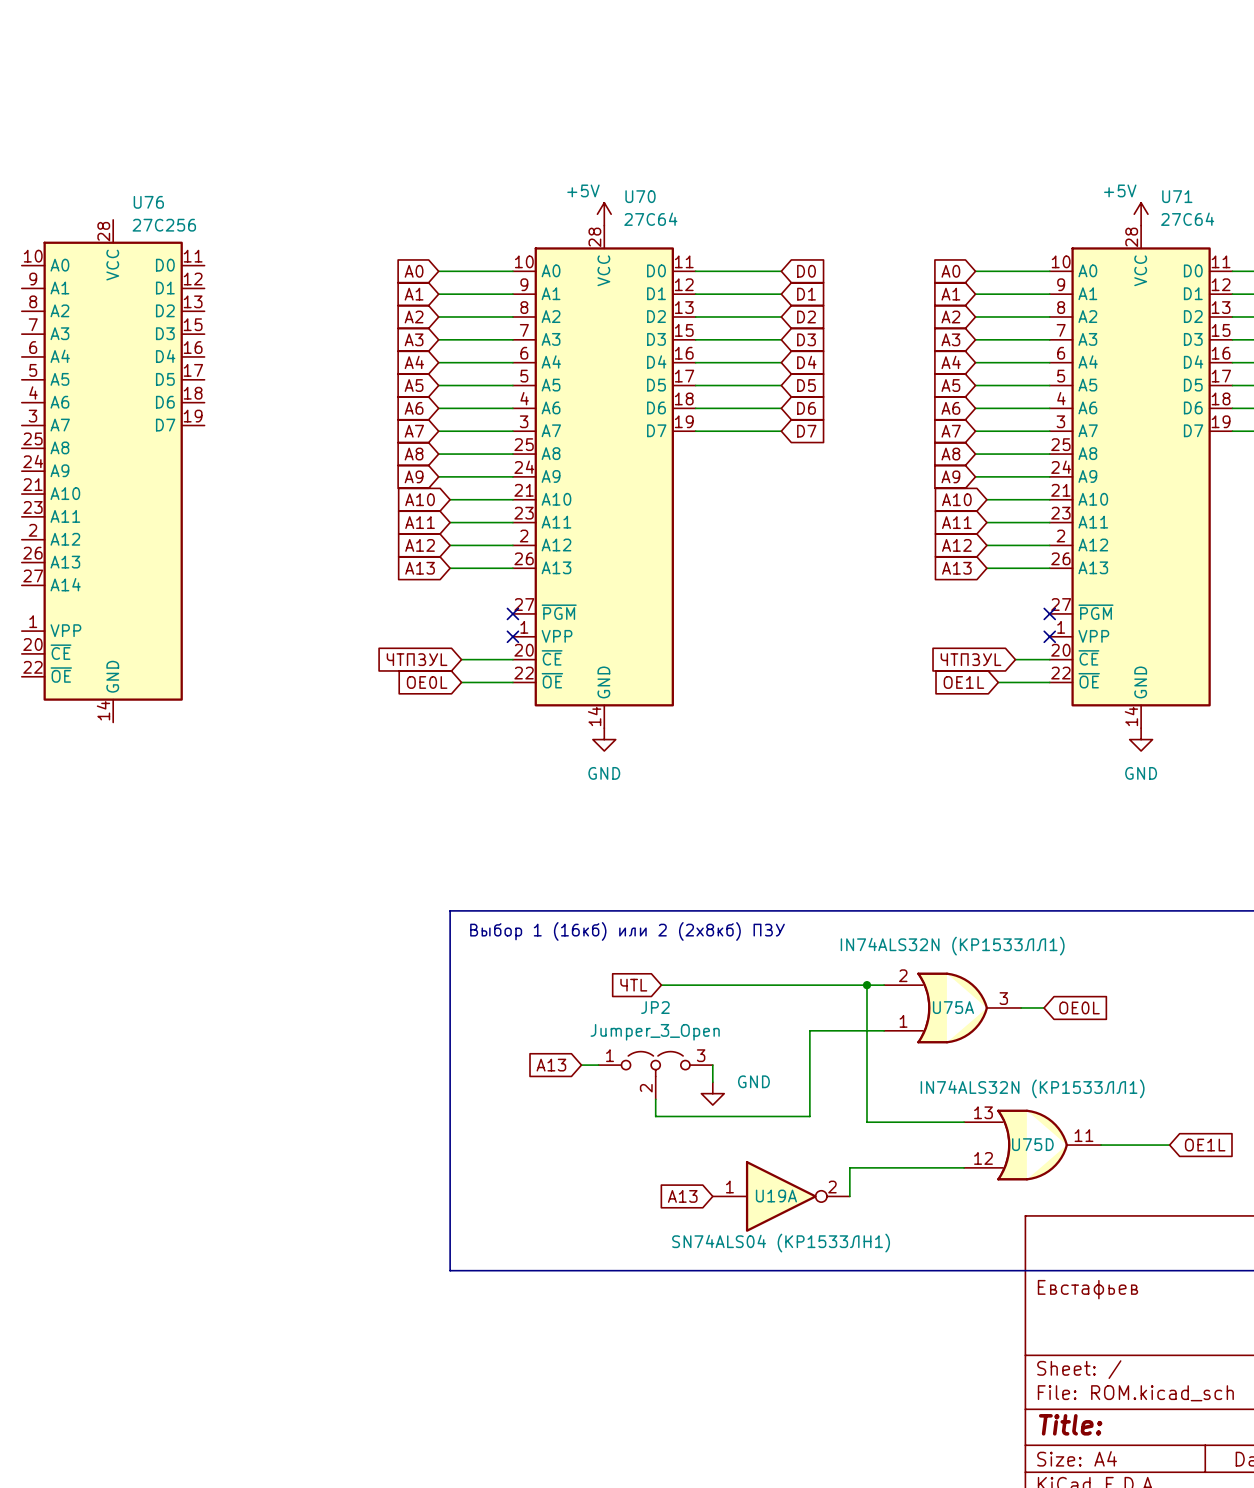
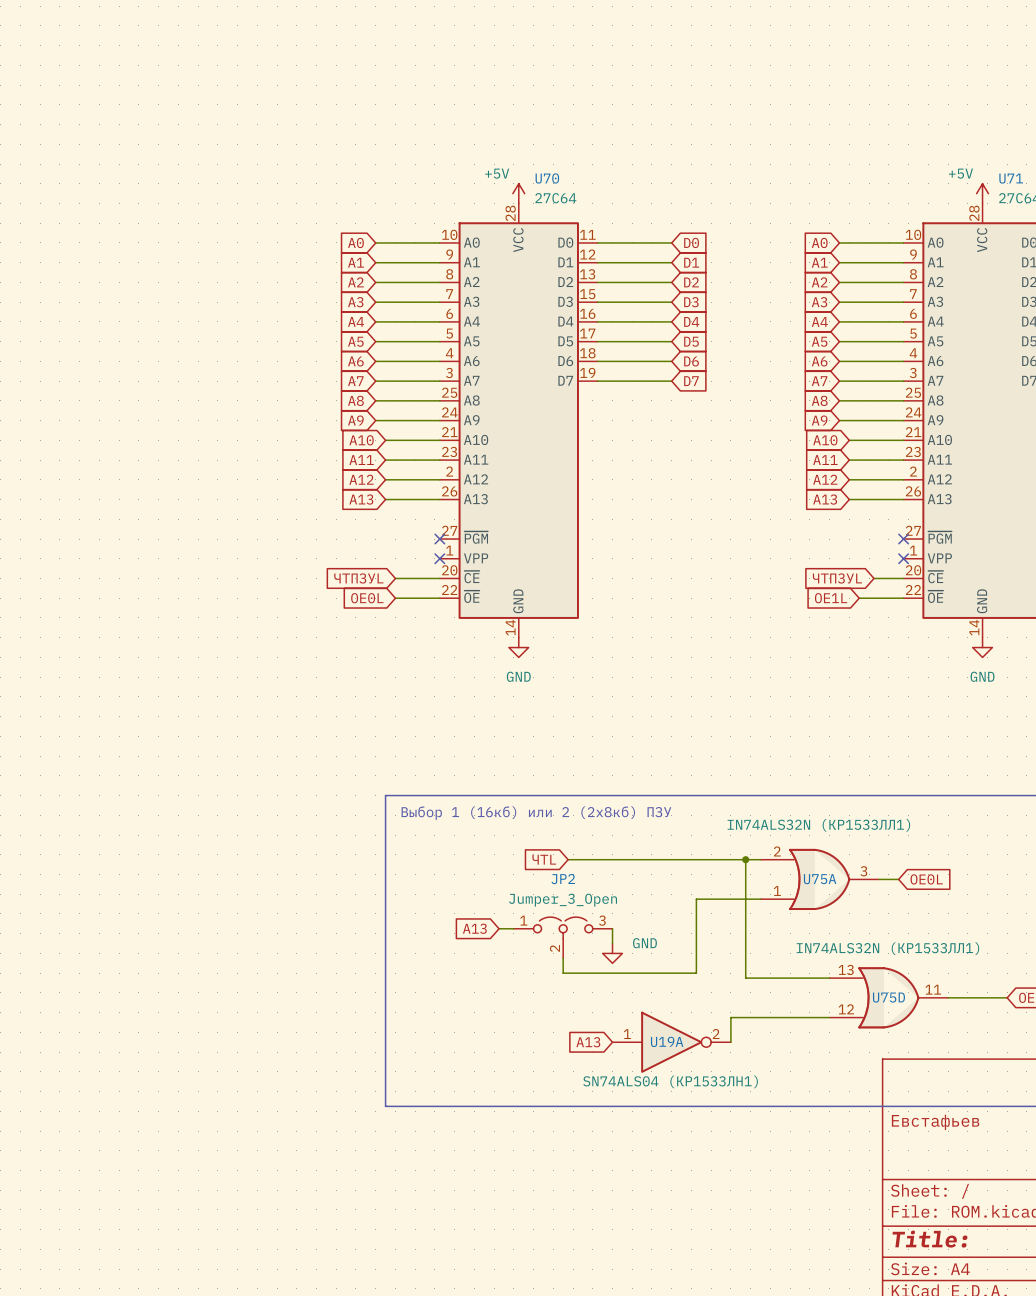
U76: 27C256 (113, 471) -> none

